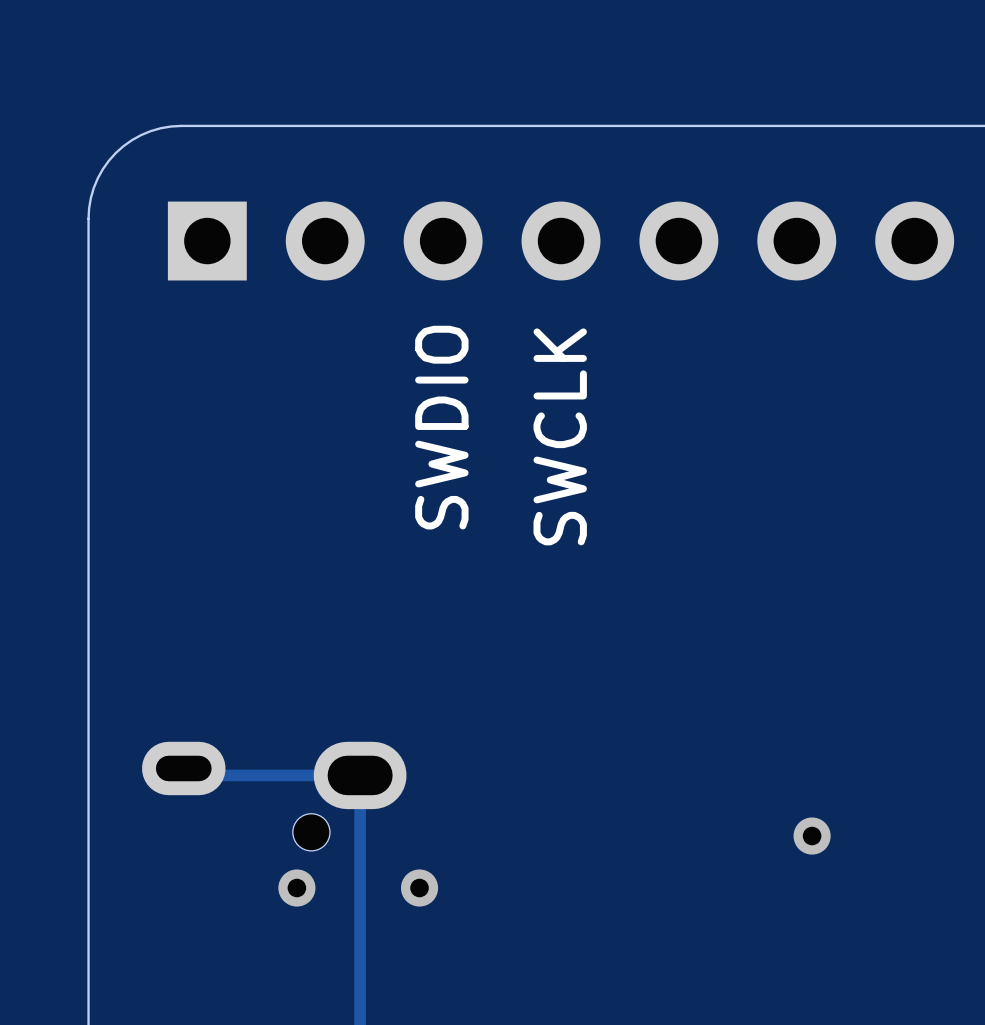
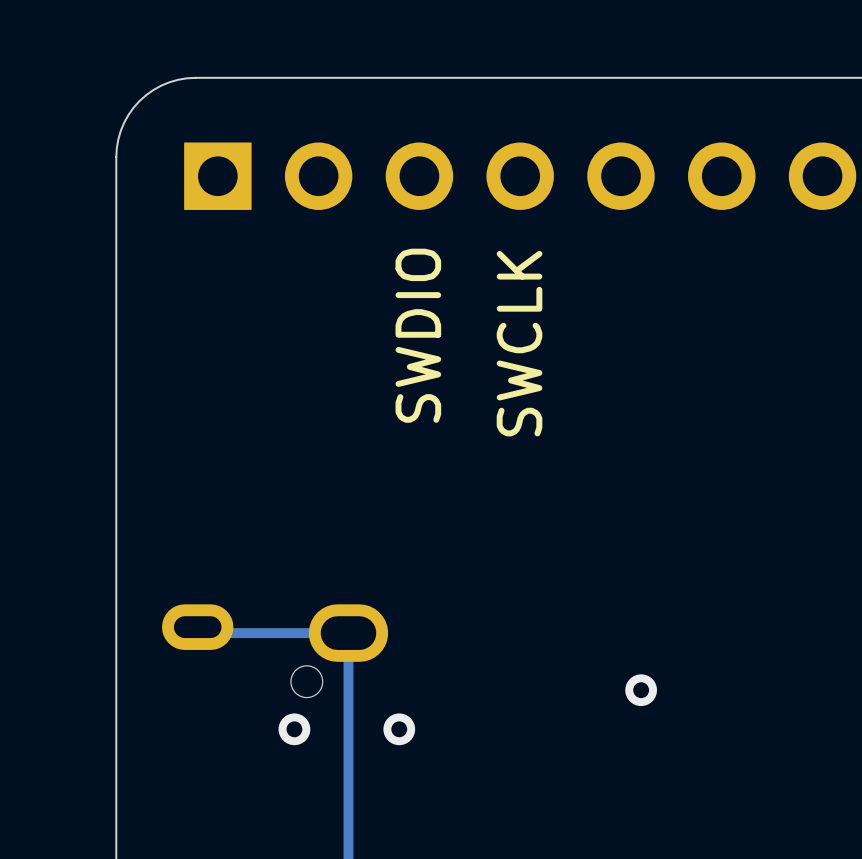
via position: (812, 836) -> (641, 690)

